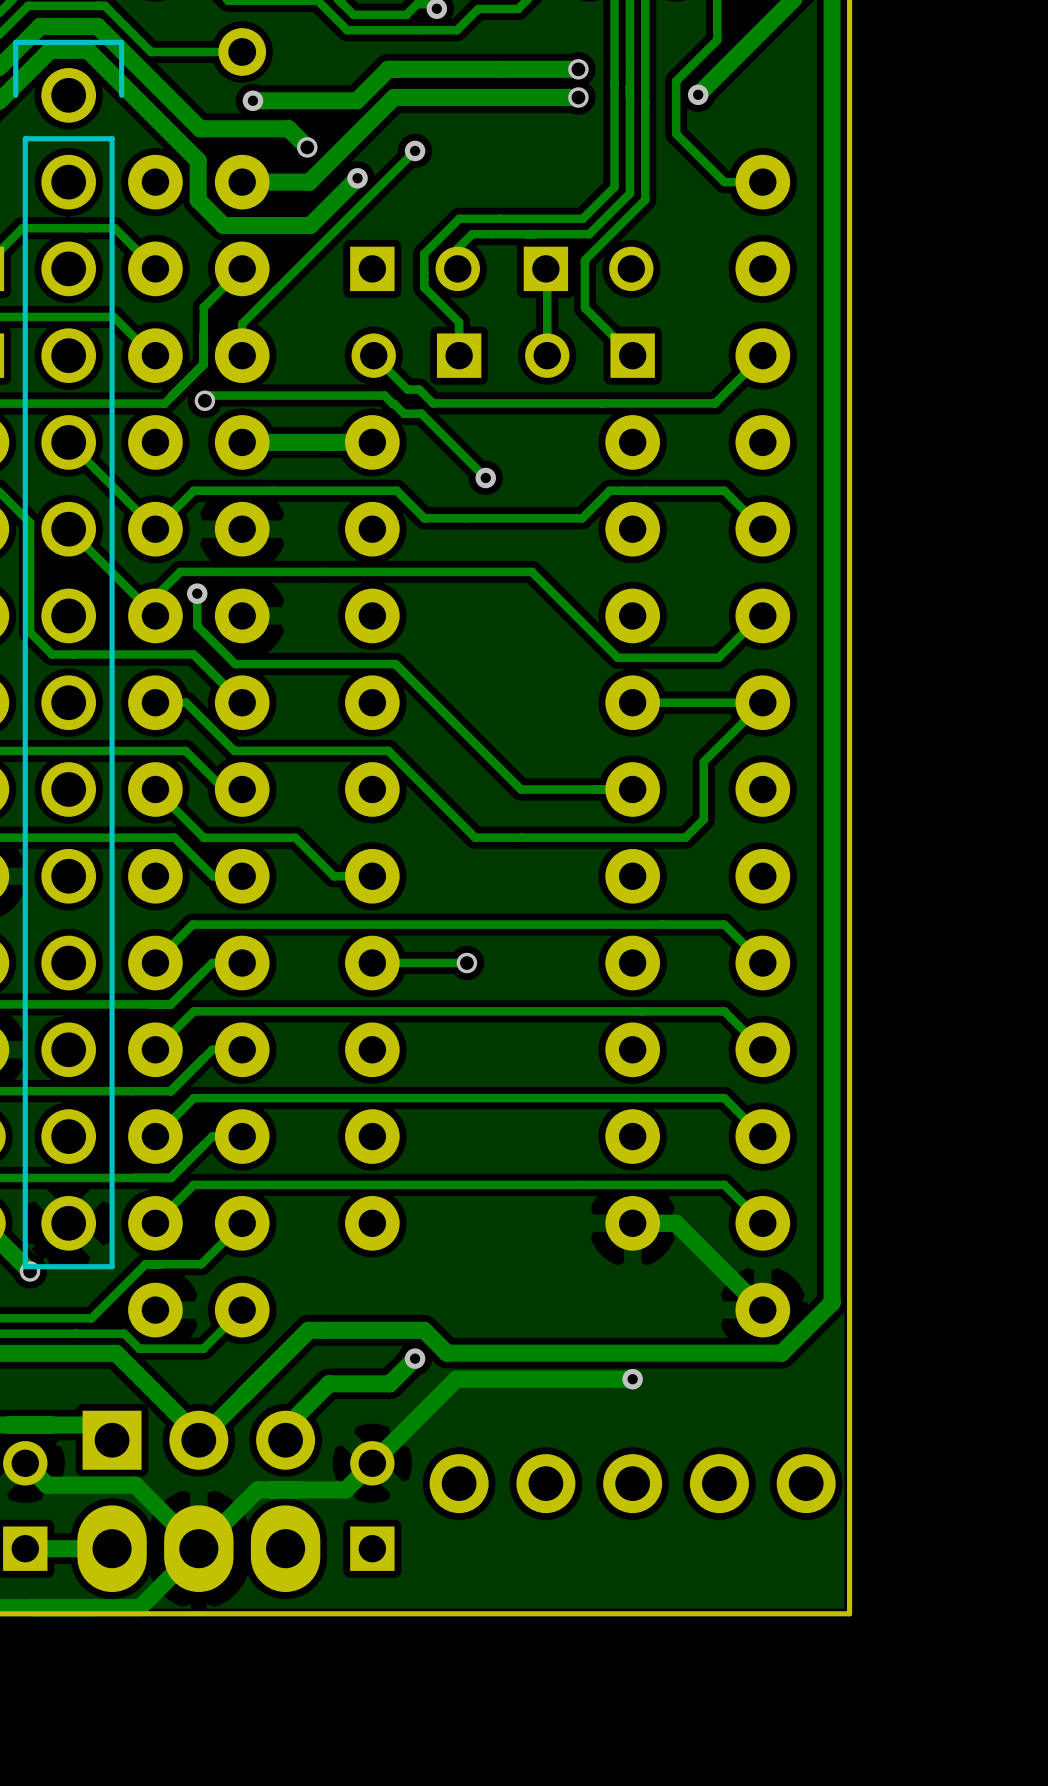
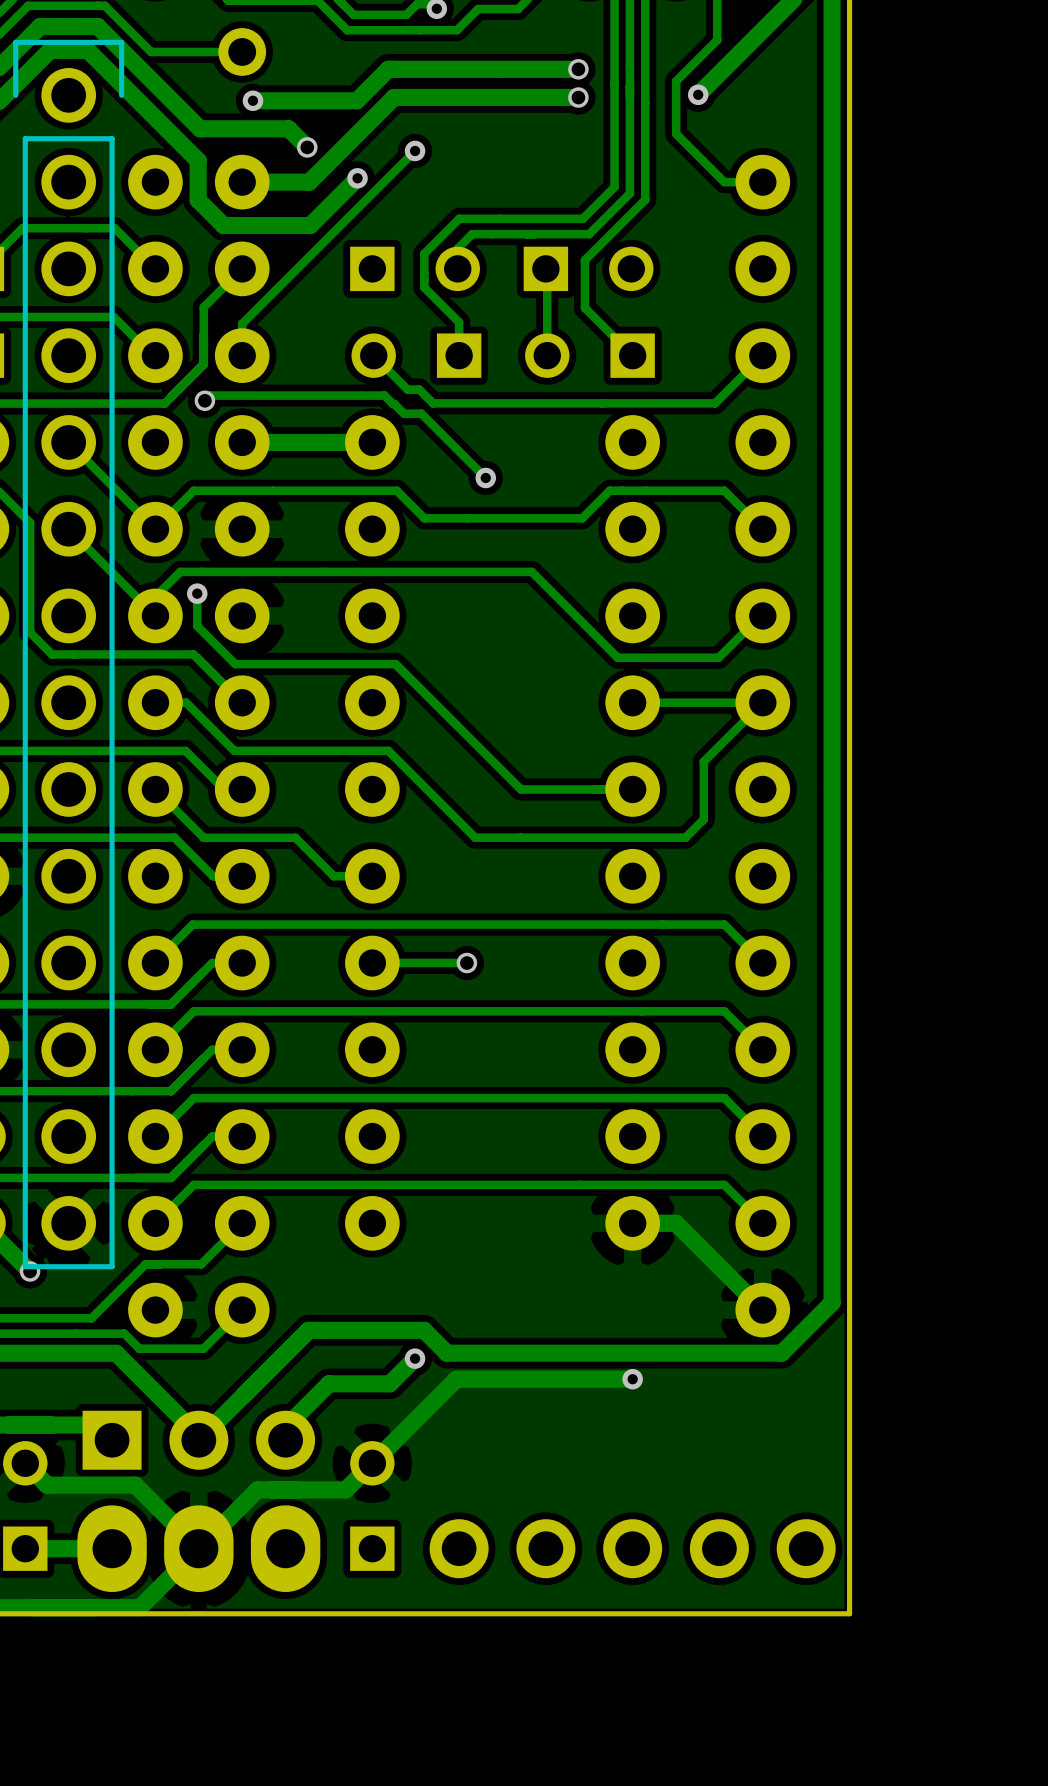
part position: (632, 1483) -> (632, 1548)

